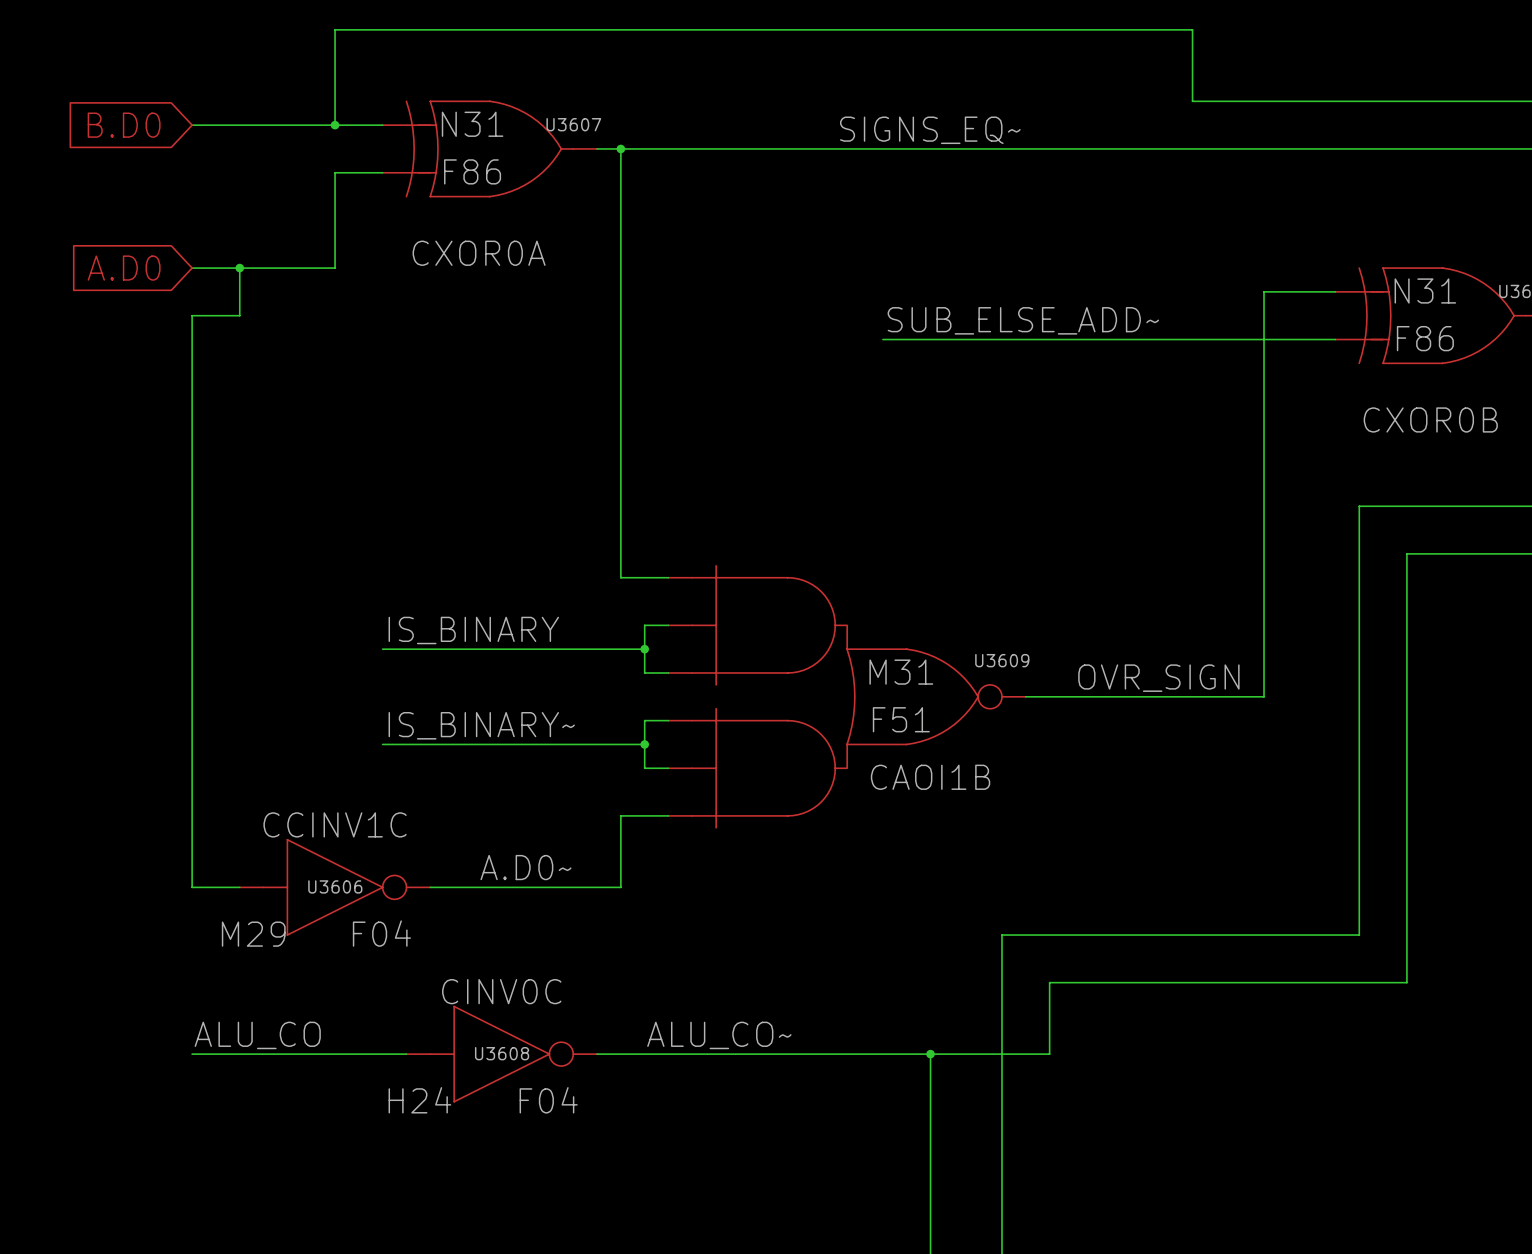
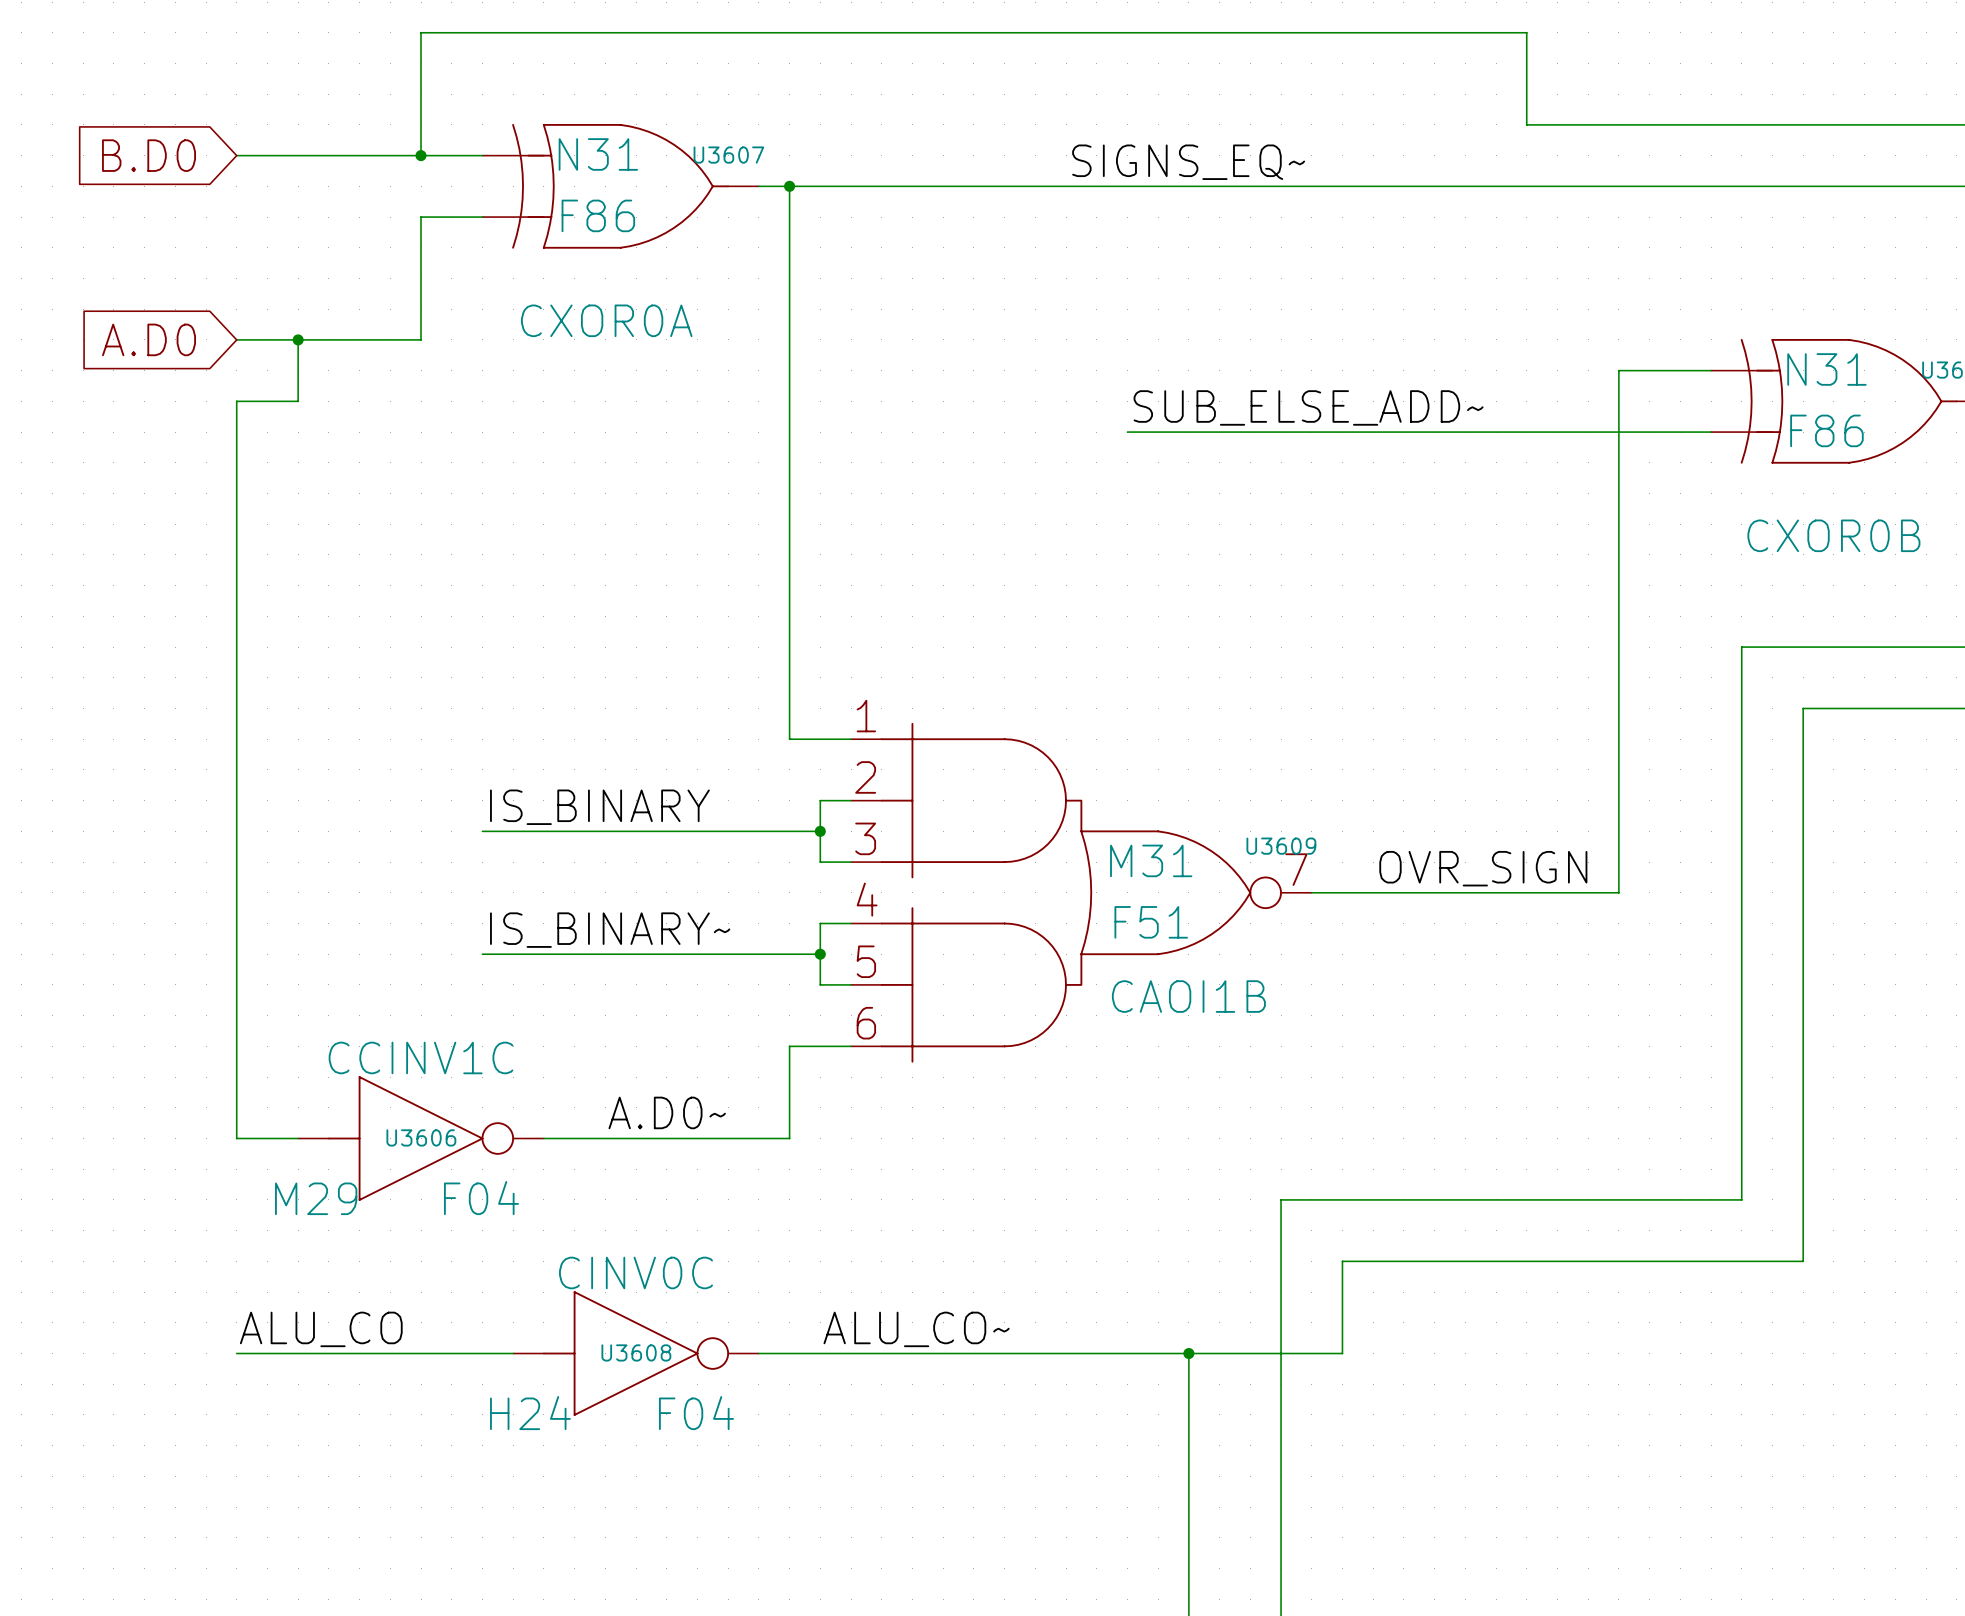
U3609 pin number: none -> 1 (866, 716)
U3609 pin number: none -> 2 (865, 777)
U3609 pin number: none -> 3 (865, 838)
U3609 pin number: none -> 7 (1296, 869)
U3609 pin number: none -> 4 (867, 899)
U3609 pin number: none -> 5 (866, 961)
U3609 pin number: none -> 6 (866, 1023)

